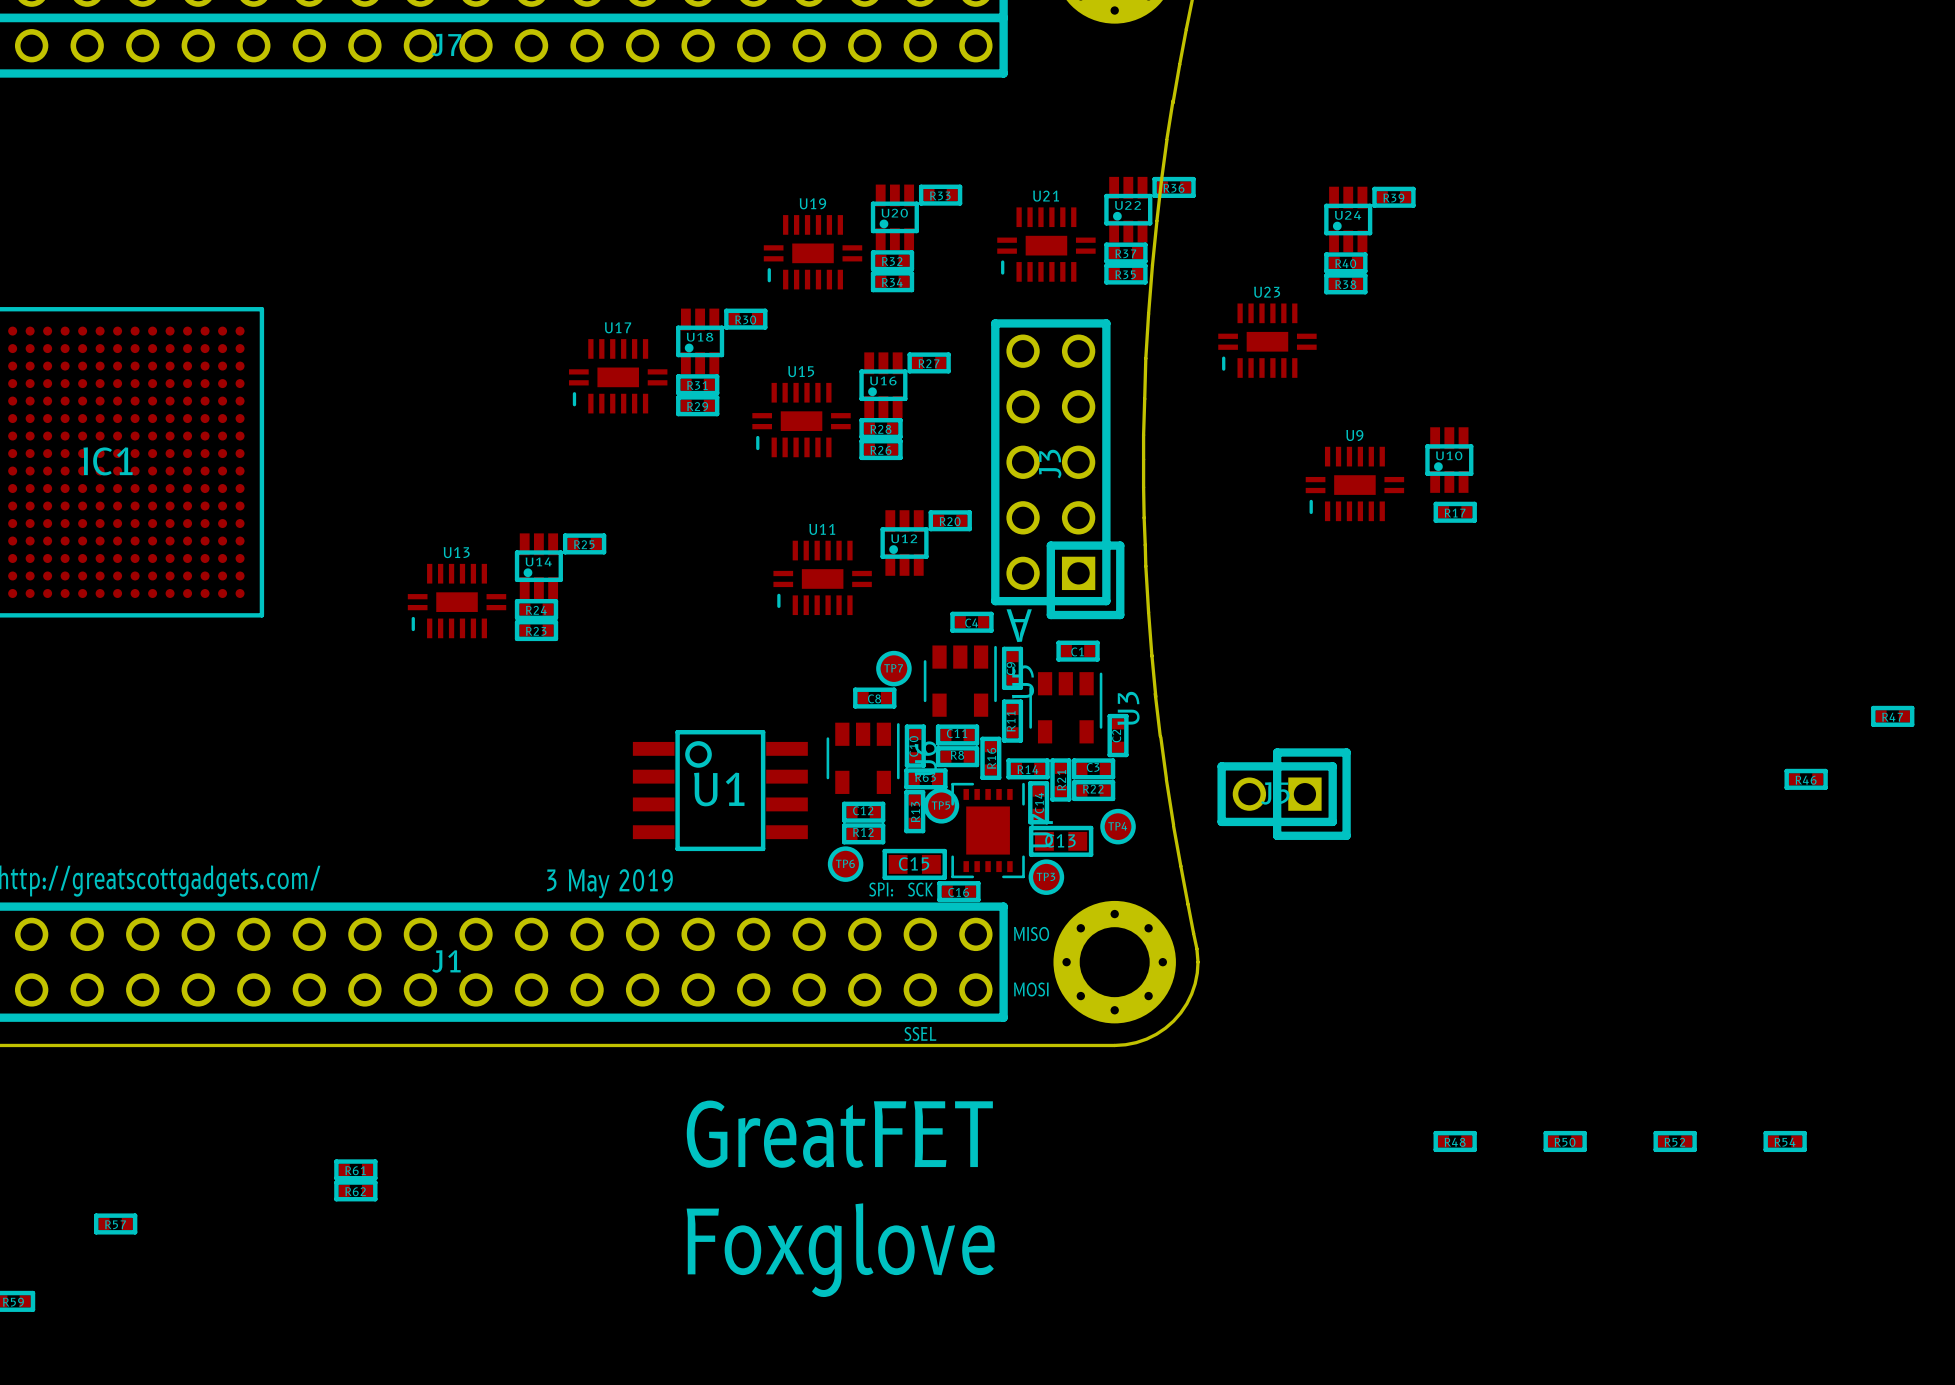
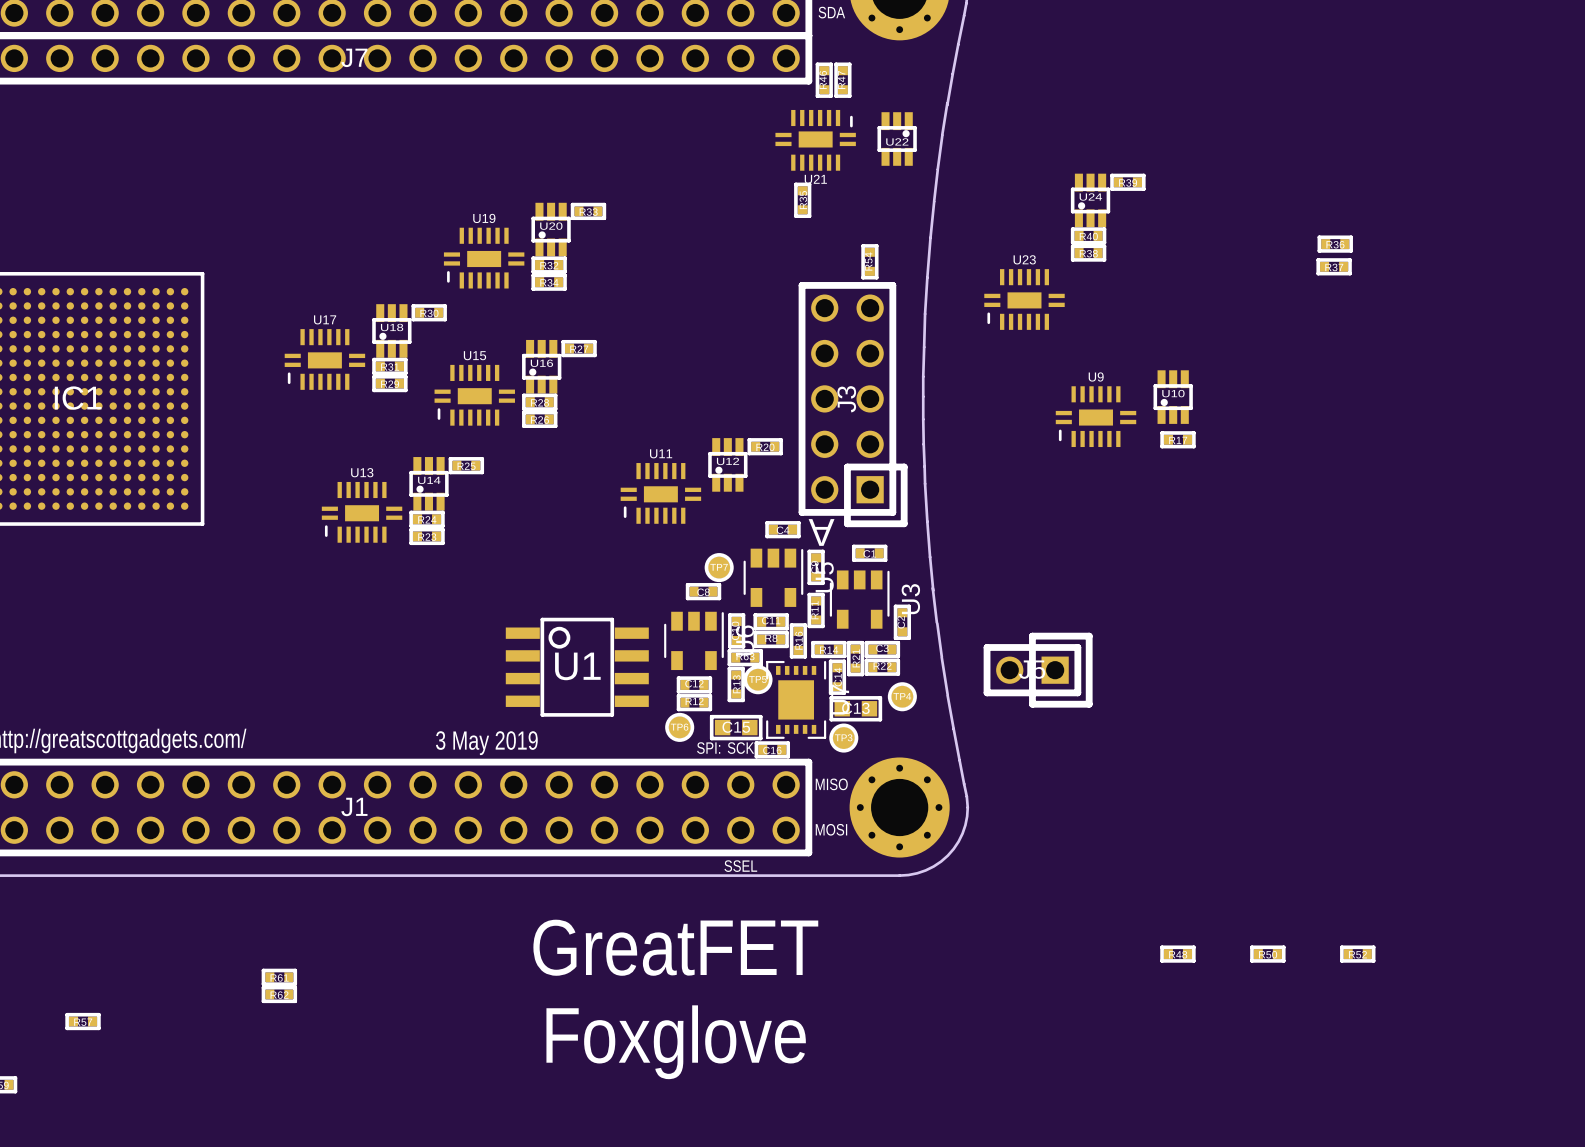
R36 position: (1174, 187) -> (1335, 244)
R33 position: (940, 195) -> (588, 211)
U22 rotation: 0° (1128, 209) -> 180° (897, 139)
U22 position: (1128, 209) -> (897, 139)
U20 position: (894, 217) -> (551, 229)
U21 rotation: 0° (1046, 244) -> 180° (815, 140)
U21 position: (1046, 244) -> (815, 140)
U19 position: (813, 252) -> (484, 258)
R37 position: (1125, 253) -> (1334, 266)
R32 position: (892, 260) -> (549, 265)
R35 rotation: 0° (1125, 274) -> 90° clockwise (802, 200)
R35 position: (1125, 274) -> (802, 200)
R34 position: (892, 281) -> (549, 282)
R30 position: (745, 319) -> (429, 312)
U18 position: (700, 341) -> (391, 330)
R27 position: (929, 362) -> (579, 348)
U17 position: (618, 376) -> (324, 359)
R31 position: (697, 384) -> (389, 366)
U16 position: (883, 385) -> (541, 366)
R29 position: (697, 405) -> (389, 383)
U15 position: (801, 420) -> (474, 395)
R28 position: (881, 428) -> (539, 402)
R26 position: (881, 449) -> (539, 419)
R47 rotation: 0° (1892, 716) -> 90° clockwise (842, 80)
R47 position: (1892, 716) -> (842, 80)
R46 rotation: 0° (1806, 779) -> 90° clockwise (824, 80)
R46 position: (1806, 779) -> (824, 80)
R54 rotation: 0° (1785, 1141) -> 90° clockwise (869, 261)
R54 position: (1785, 1141) -> (869, 261)

